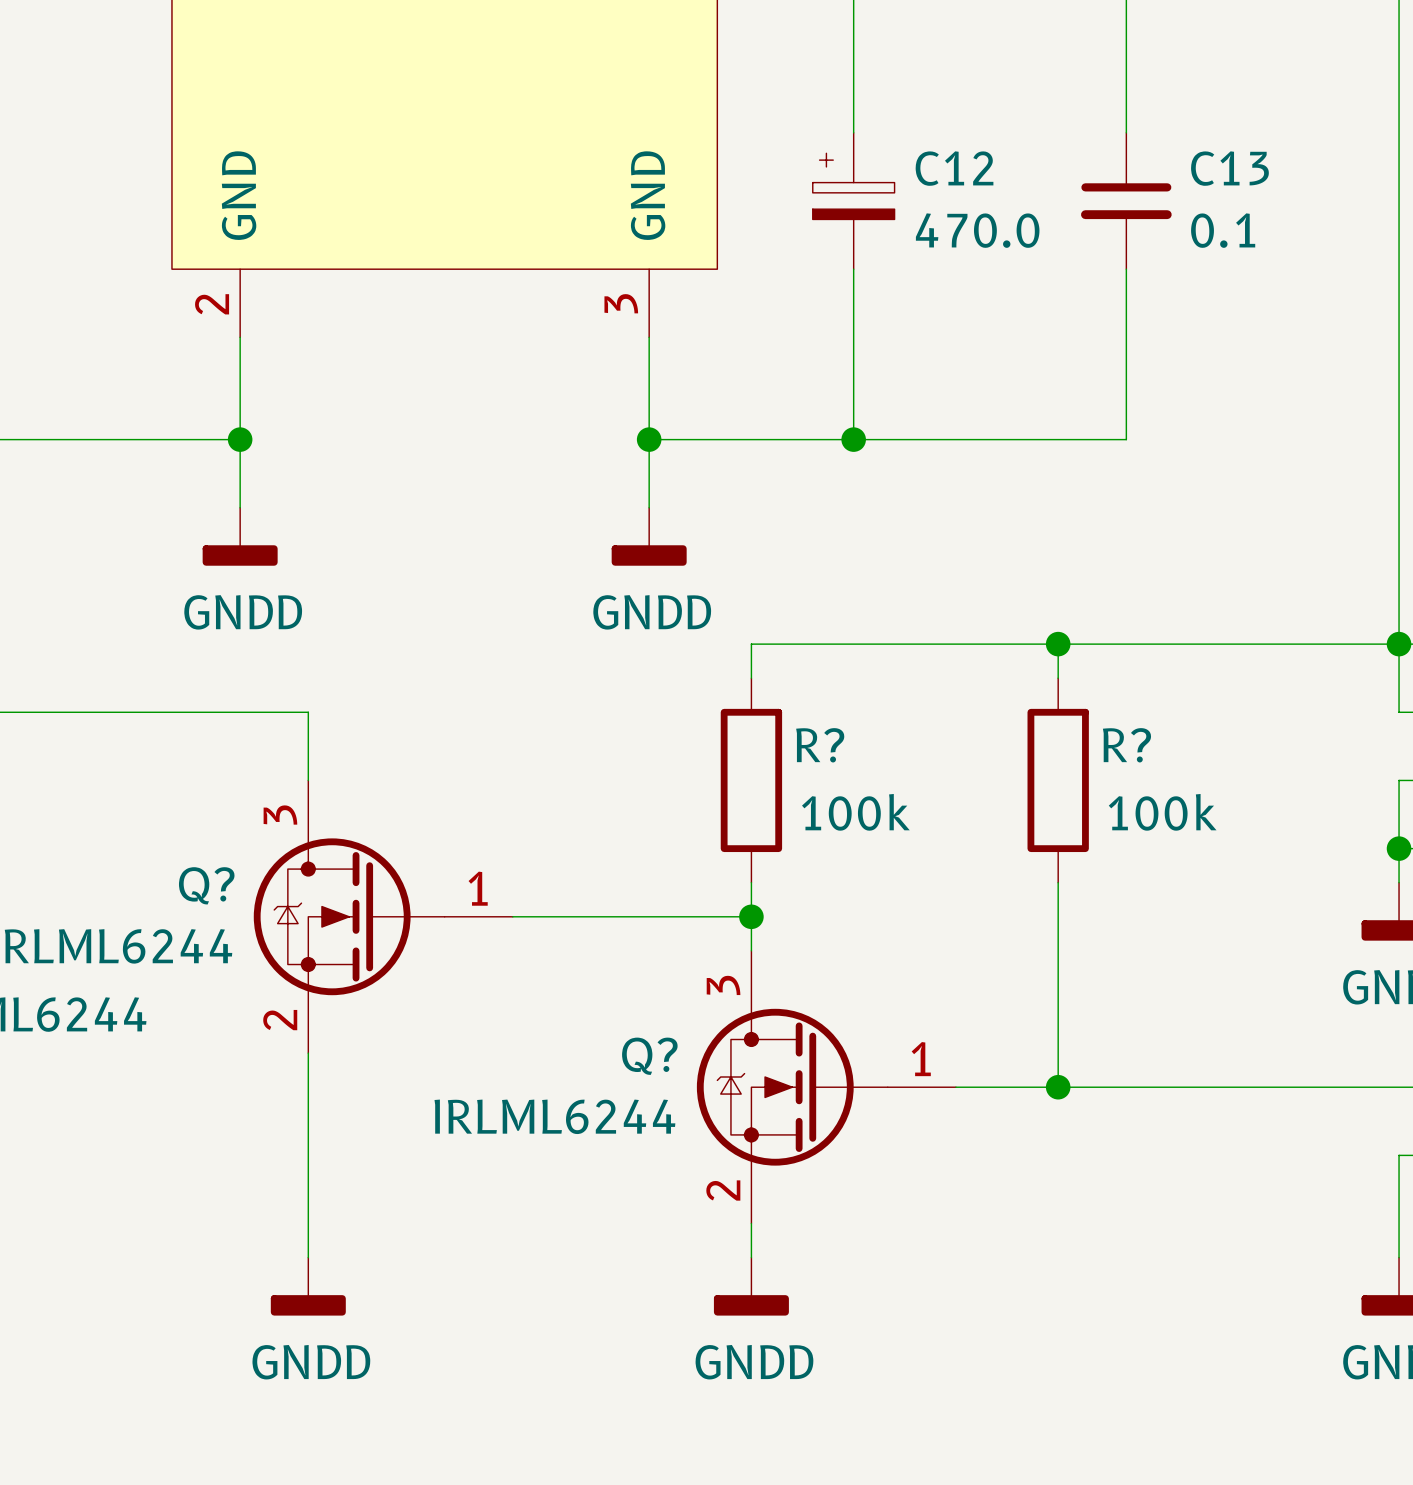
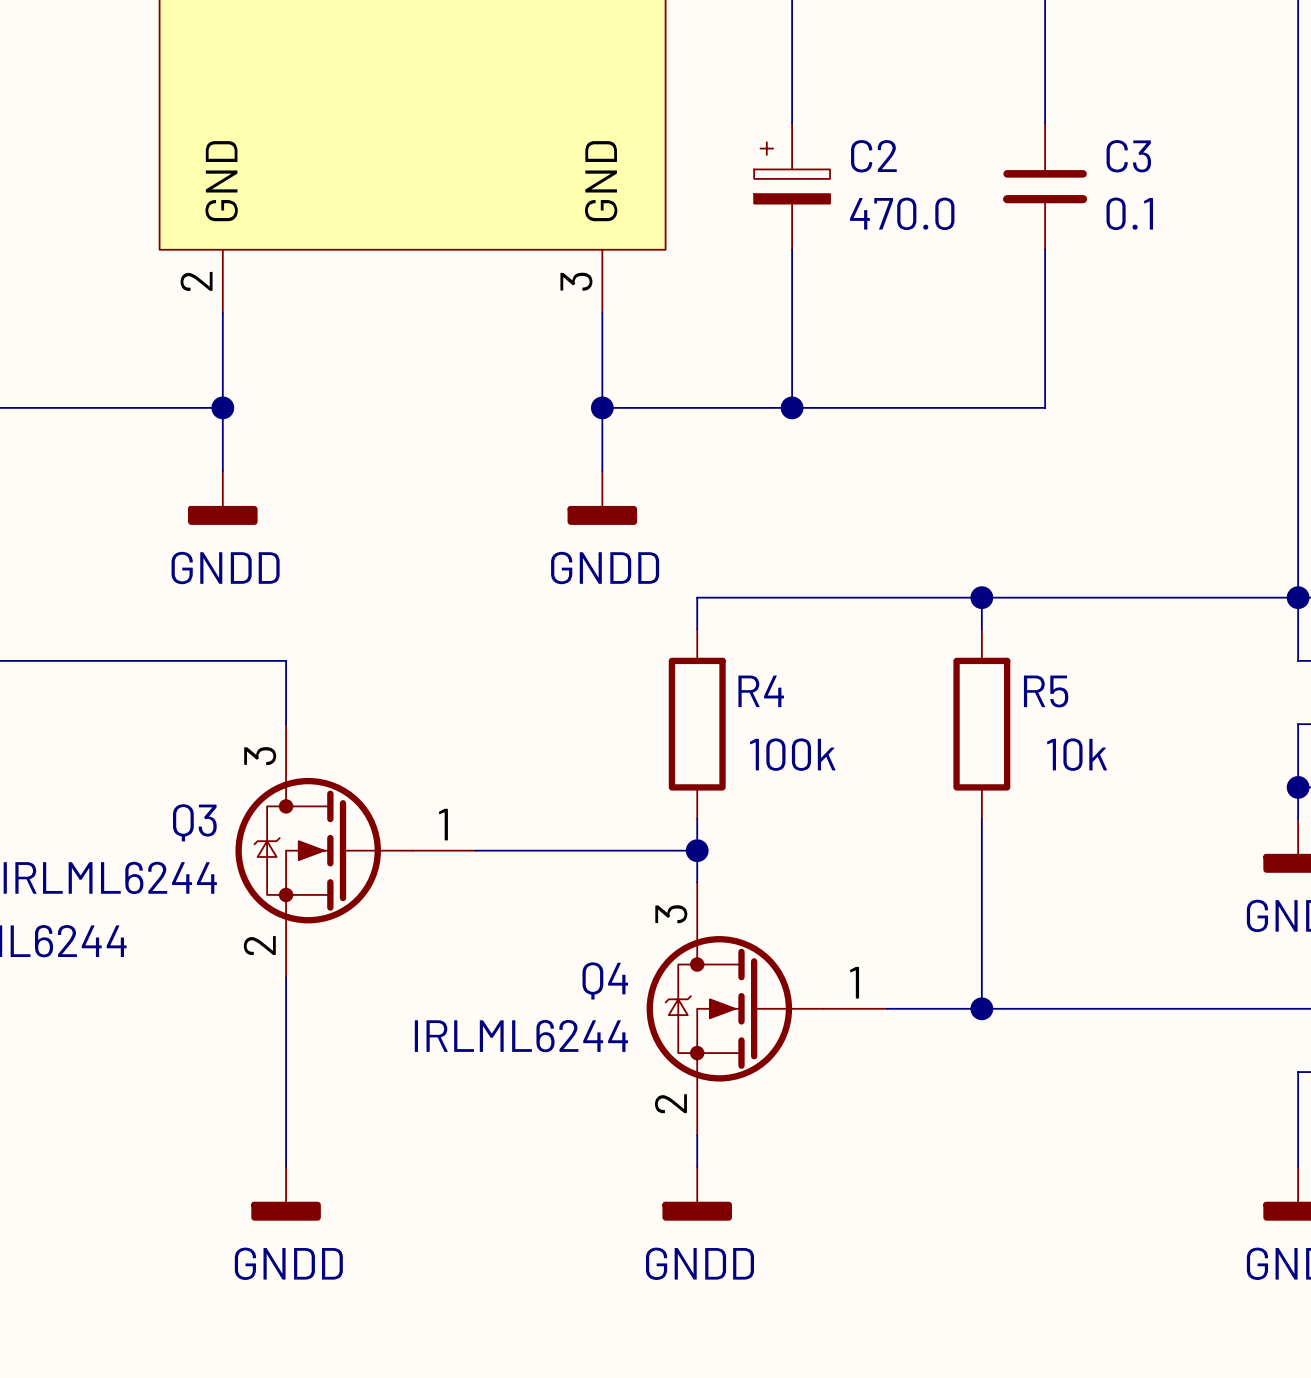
C12 name: C12 (954, 168) -> C2 (873, 156)
C13 name: C13 (1229, 168) -> C3 (1128, 156)
R? name: R? (820, 745) -> R4 (761, 691)
R? name: R? (1126, 745) -> R5 (1046, 691)
R? value: 100k (1162, 812) -> 10k (1077, 754)
Q? name: Q? (206, 885) -> Q3 (194, 822)
Q? name: Q? (649, 1056) -> Q4 (605, 980)

